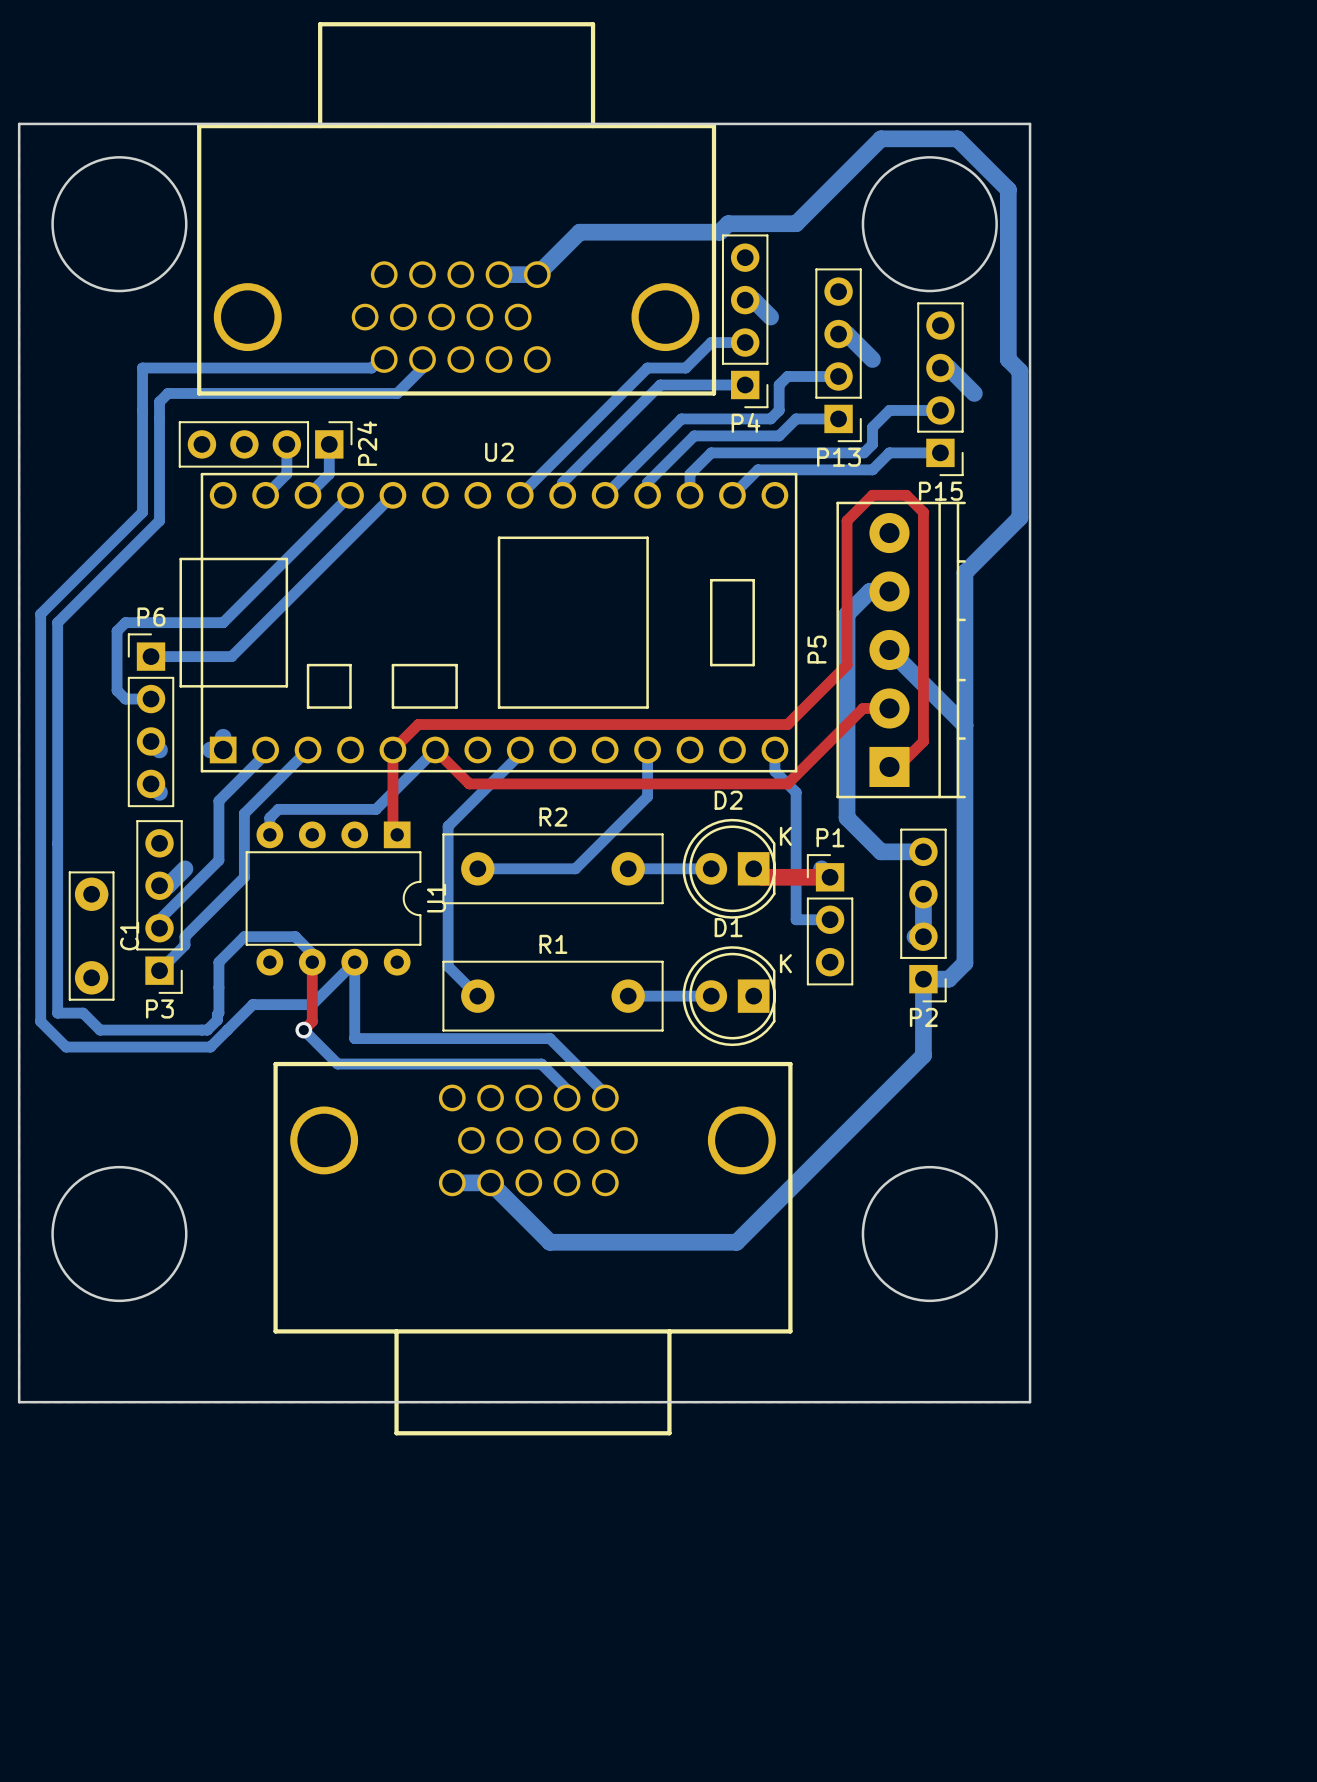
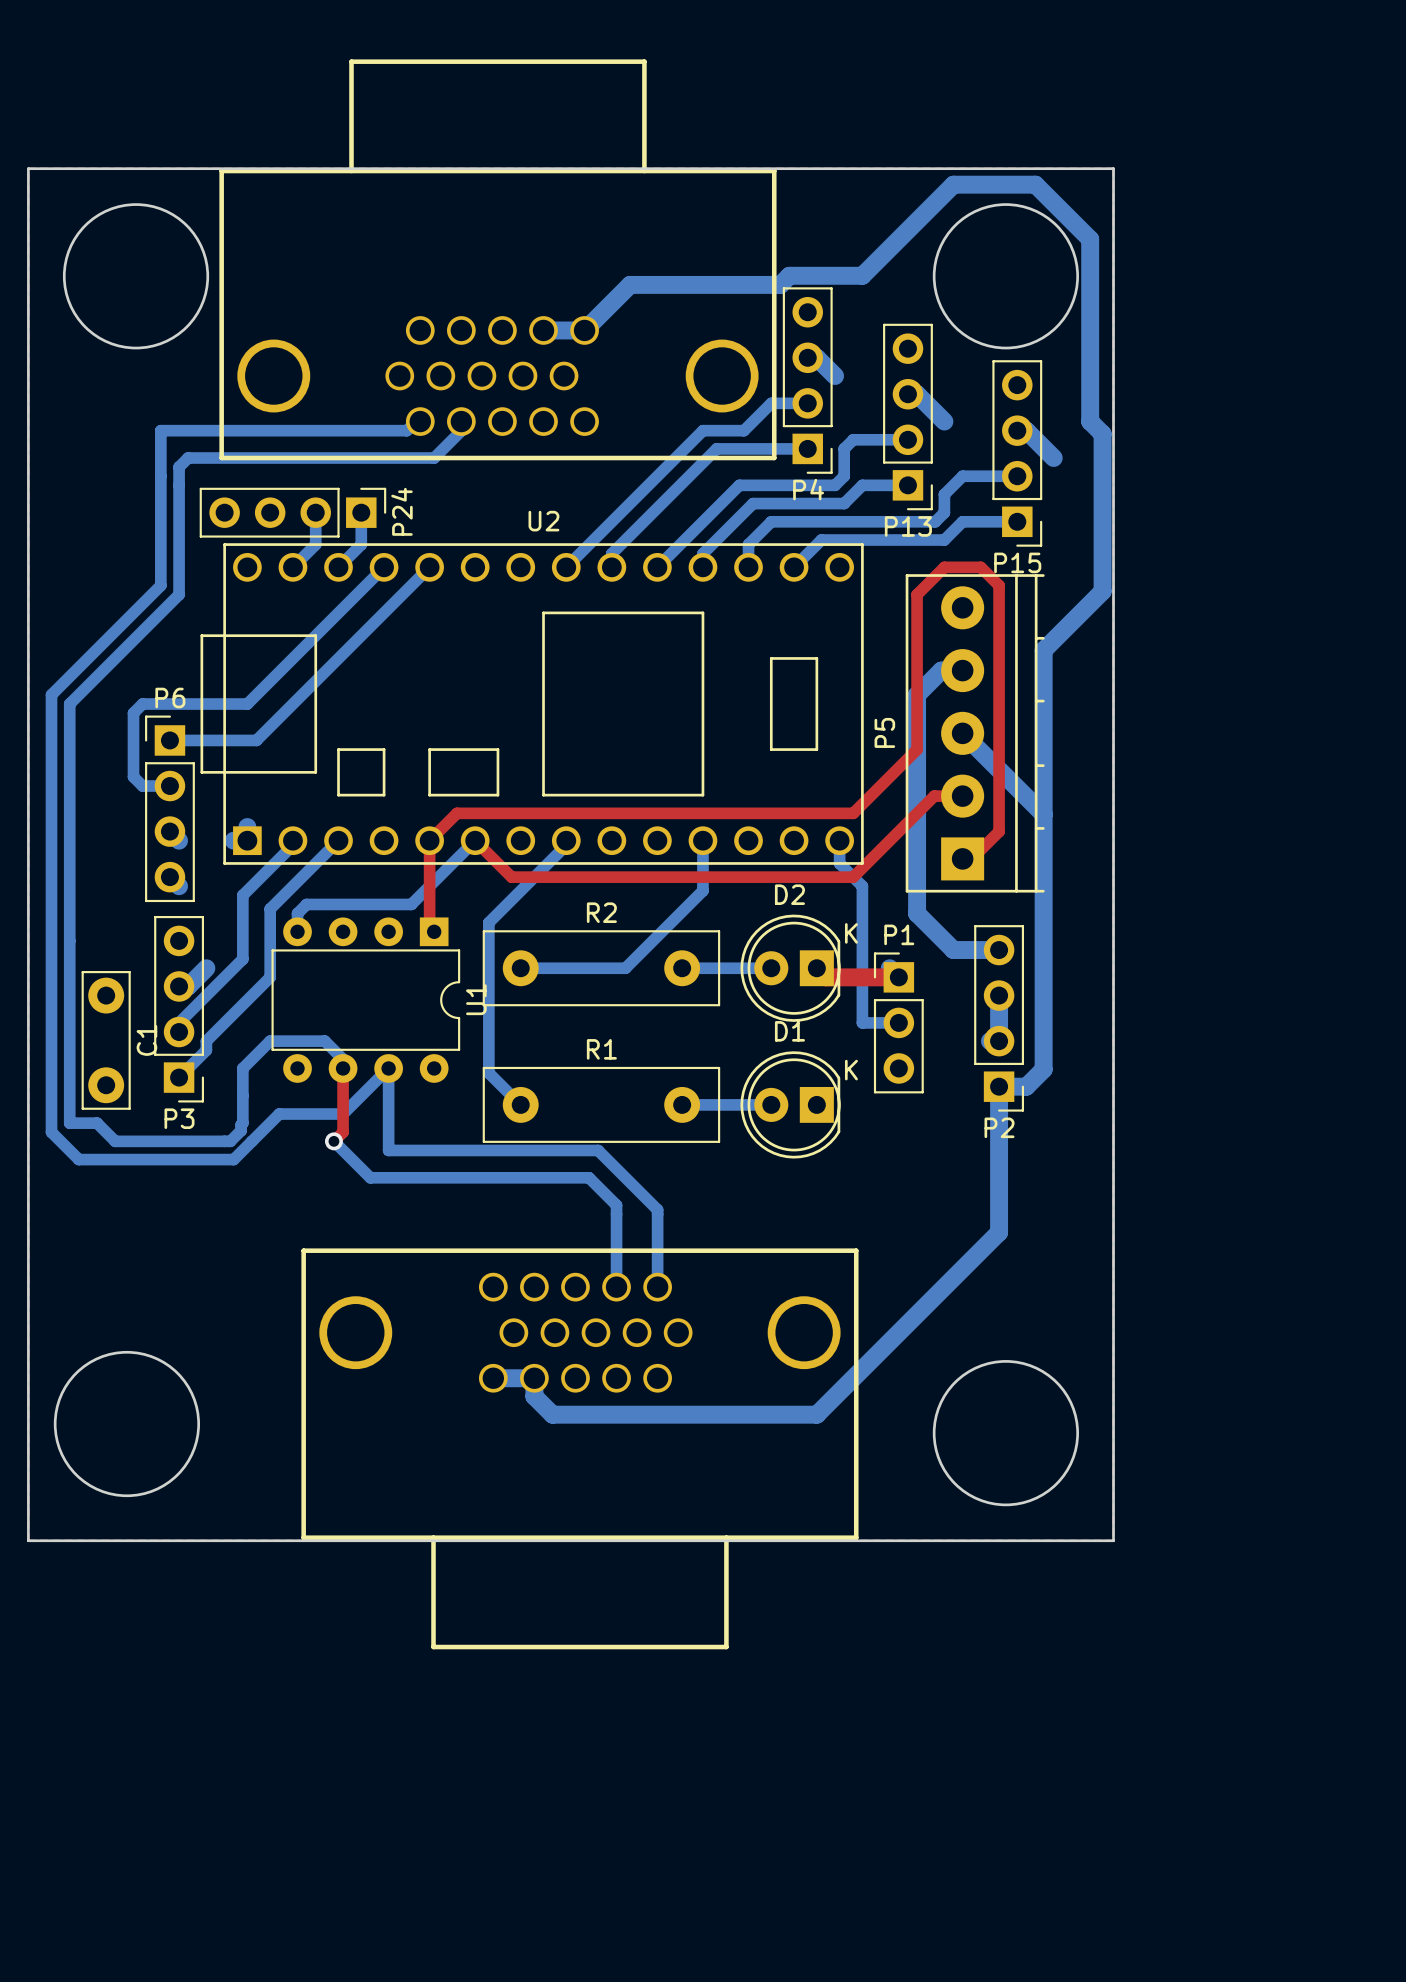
bottom track: (923, 1055) (736, 1242) (549, 1242) (490, 1182) (452, 1182) -> (999, 1168) (999, 1232) (816, 1414) (552, 1414) (534, 1396) (534, 1378) (493, 1378)
bottom track: none -> (616, 1214) (616, 1287)
bottom track: none -> (657, 1214) (657, 1287)
round board edge position: (119, 1234) -> (126, 1424)
round board edge position: (929, 1234) -> (1005, 1433)
part position: (532, 1248) -> (579, 1448)

